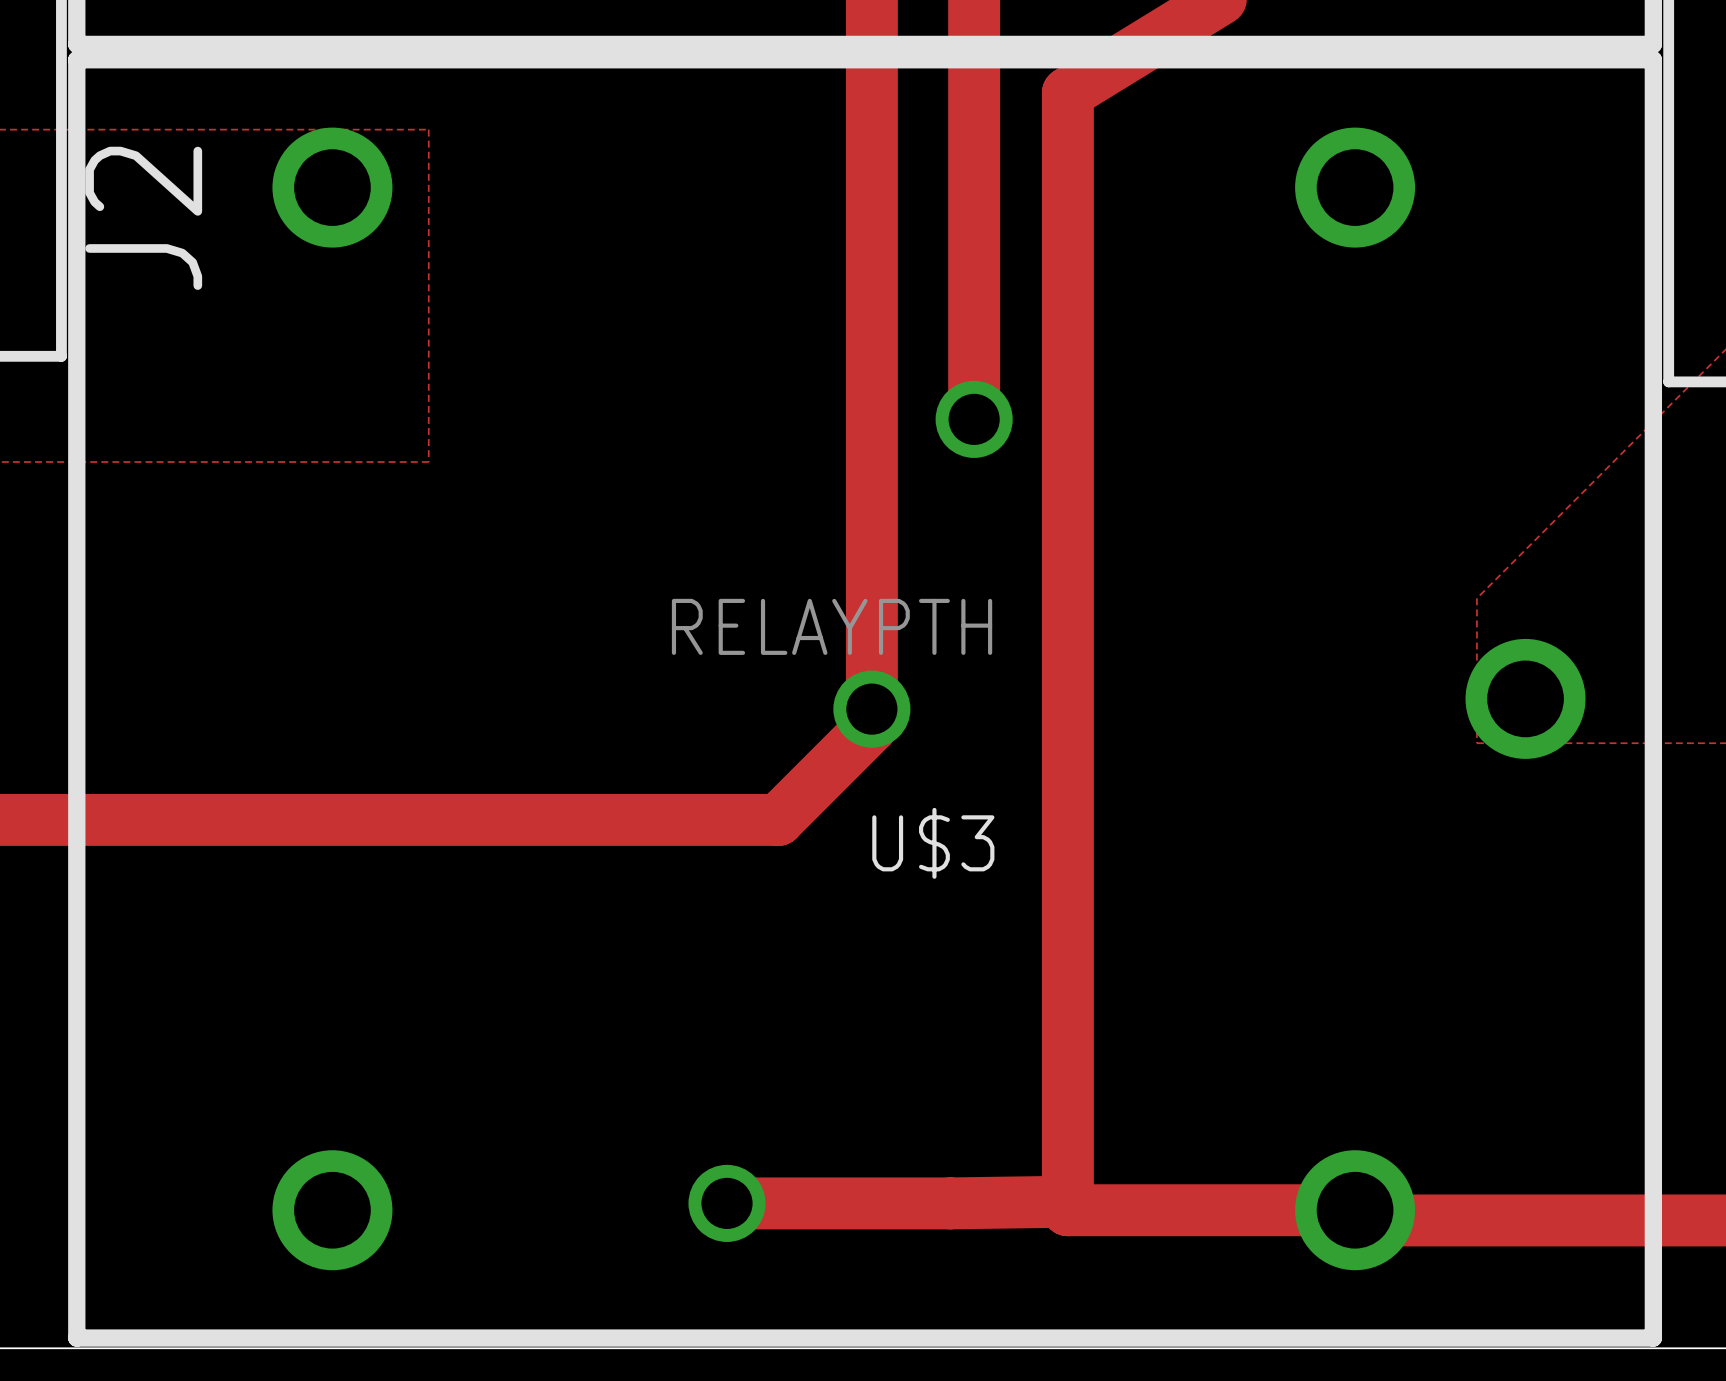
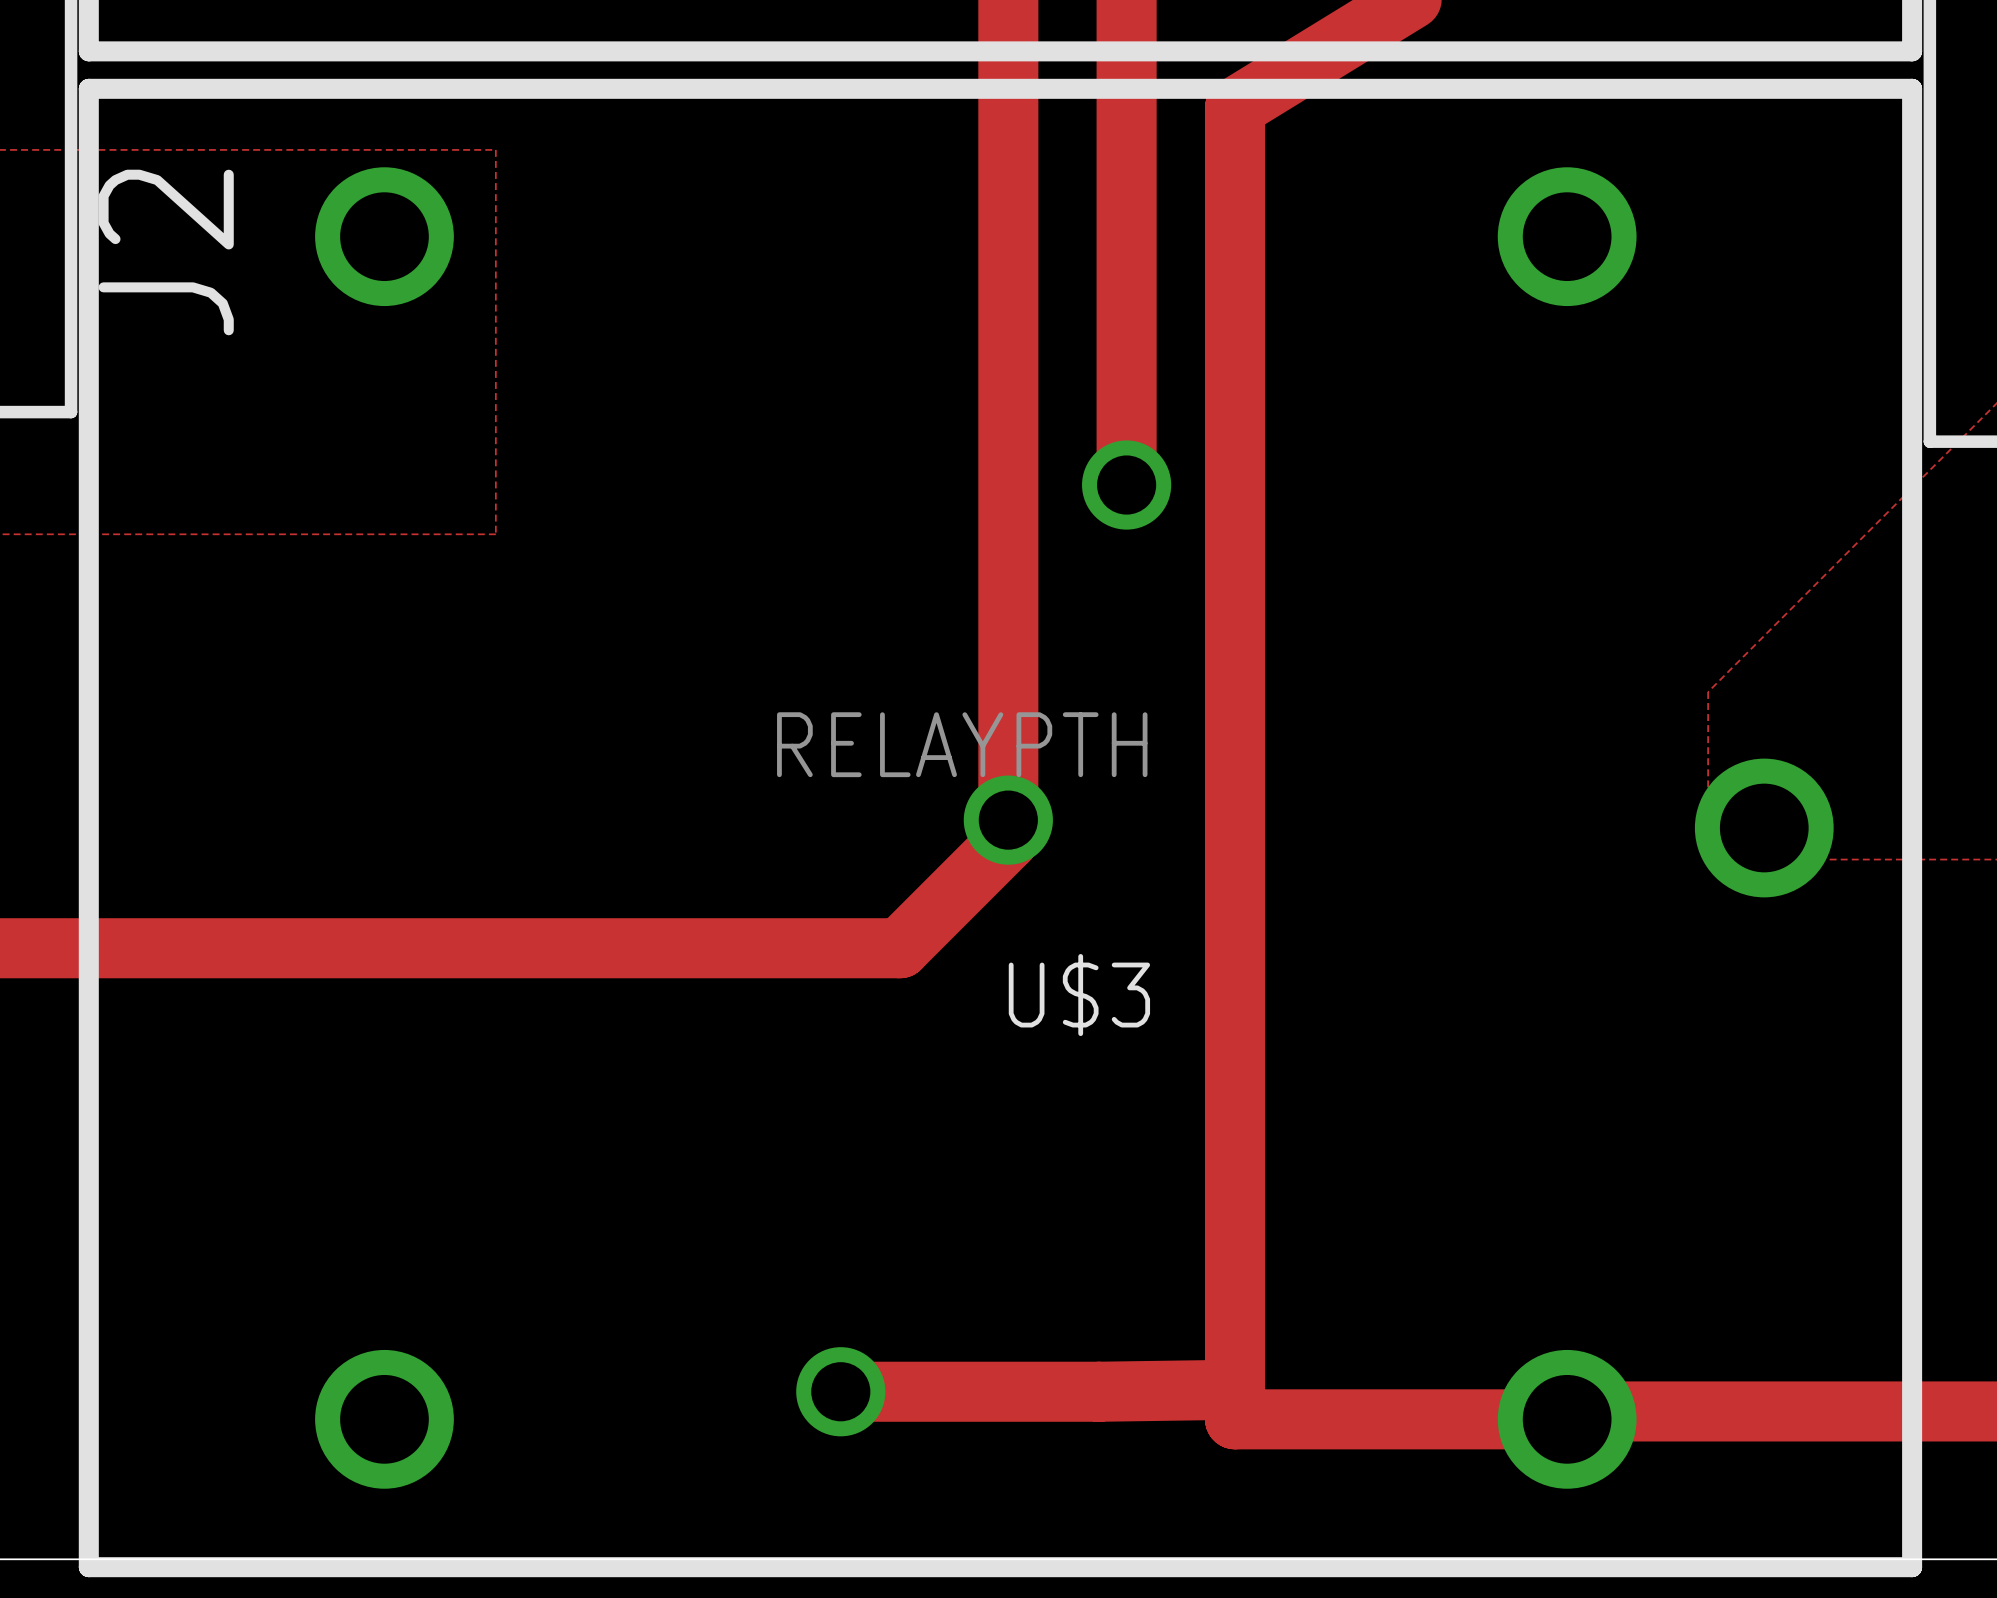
U$3 position: (865, 698) -> (1000, 828)
track: (1067, 1210) (1355, 1210) (1355, 1220) -> (1235, 1399) (1235, 1419) (1567, 1419) (1567, 1411)

